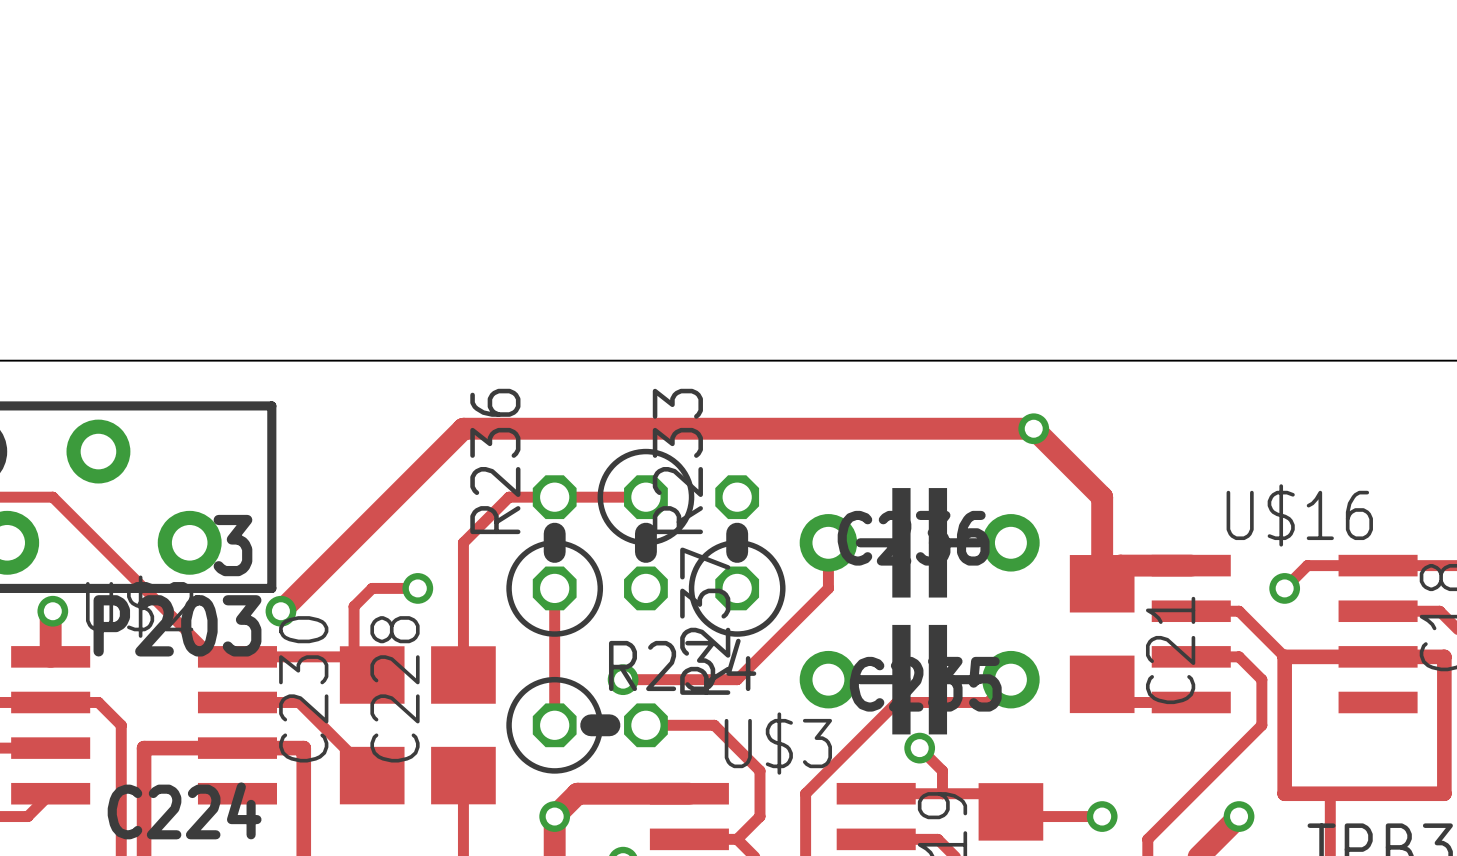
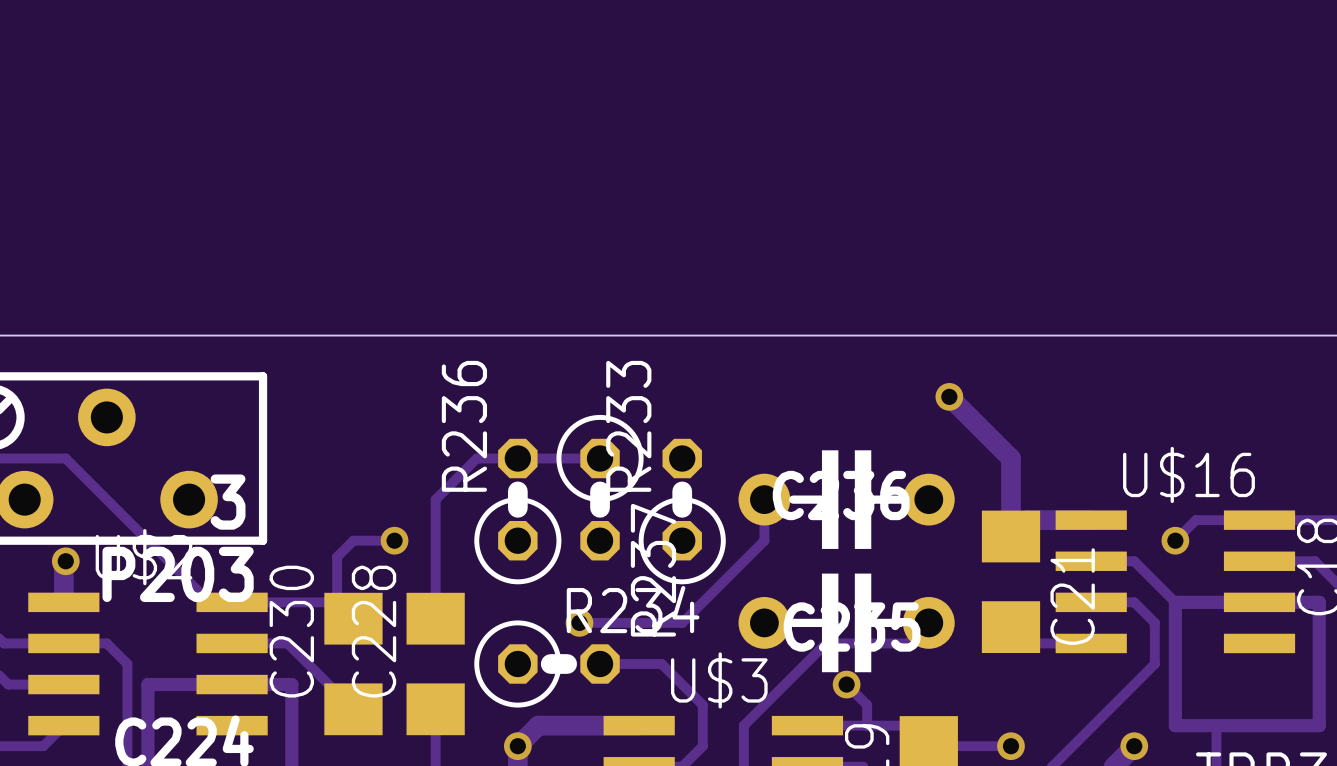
track: (1033, 428) (463, 428) (280, 611) -> none
track: (554, 588) (554, 725) -> none
via: (280, 611) -> none

